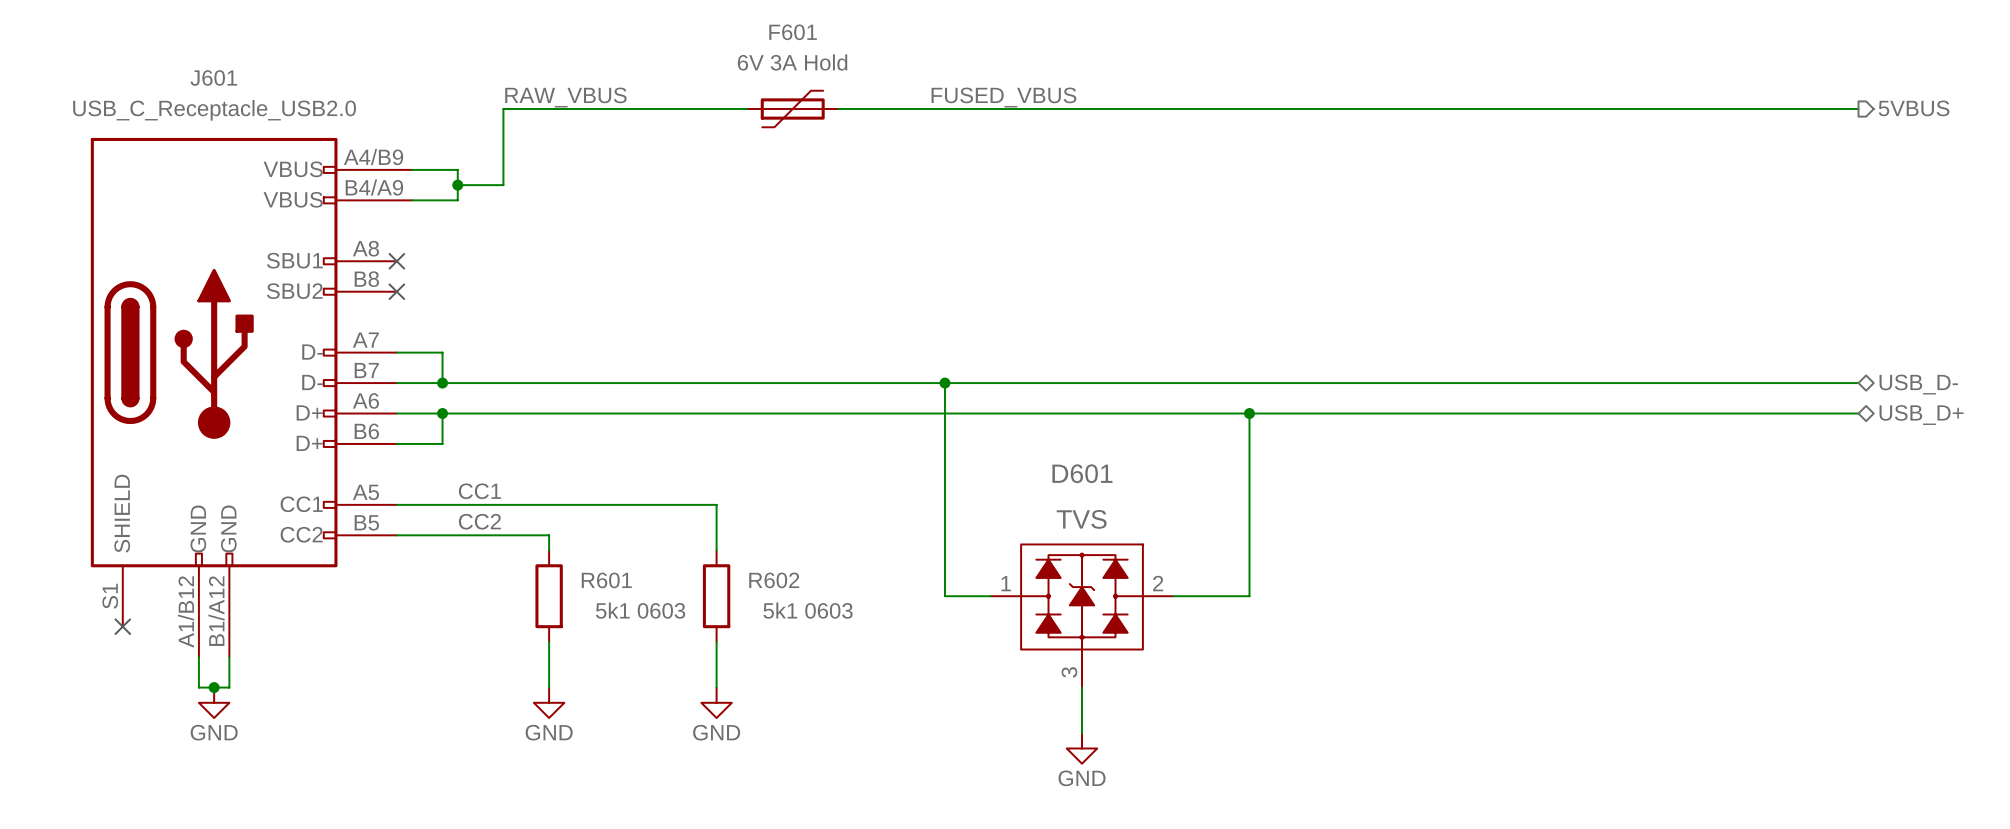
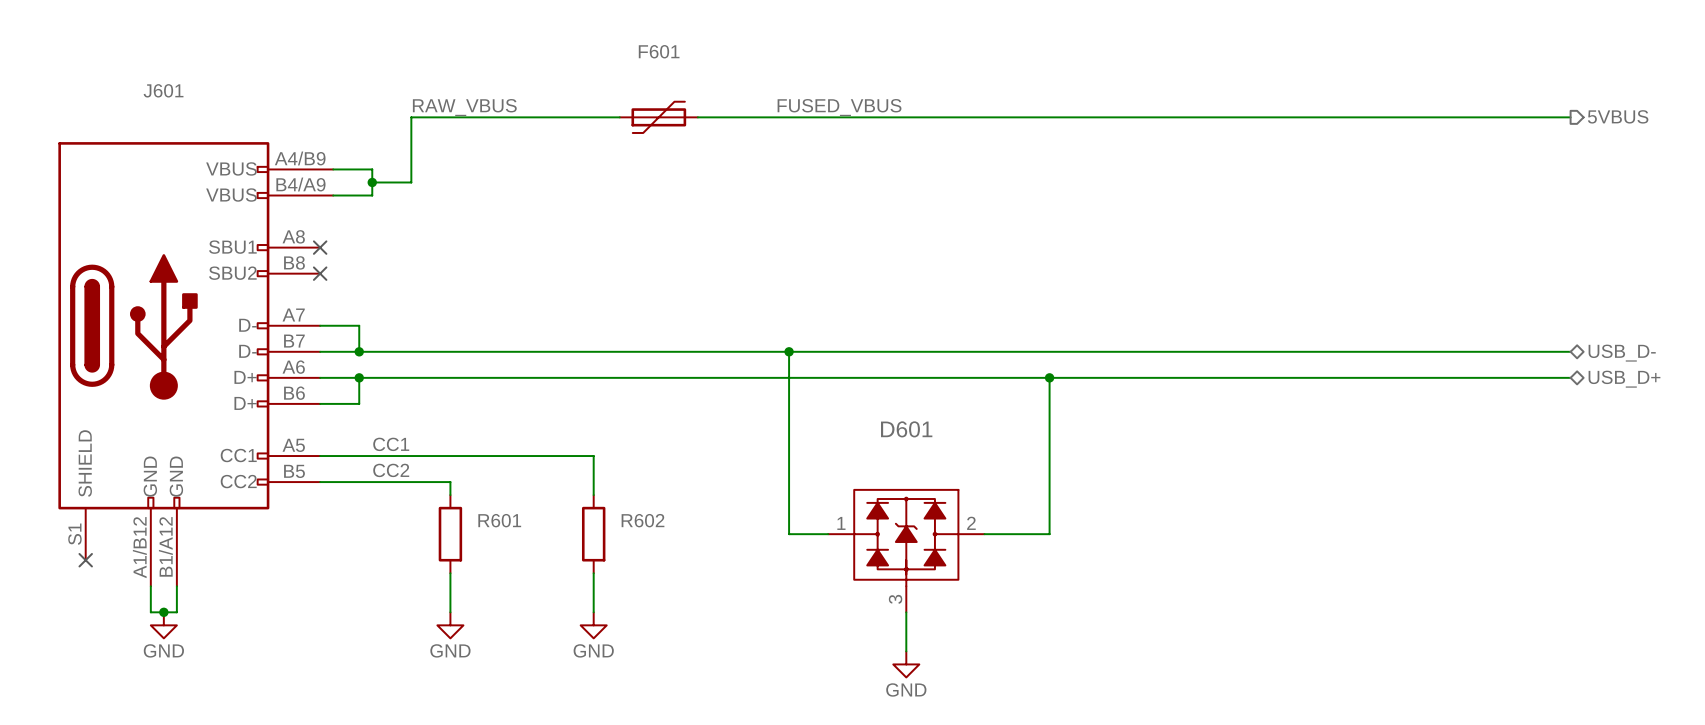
F601 value: 6V 3A Hold (792, 62) -> none
J601 value: USB_C_Receptacle_USB2.0 (214, 110) -> none
D601 value: TVS (1081, 519) -> none
R601 value: 5k1 0603 (640, 610) -> none
R602 value: 5k1 0603 (808, 610) -> none

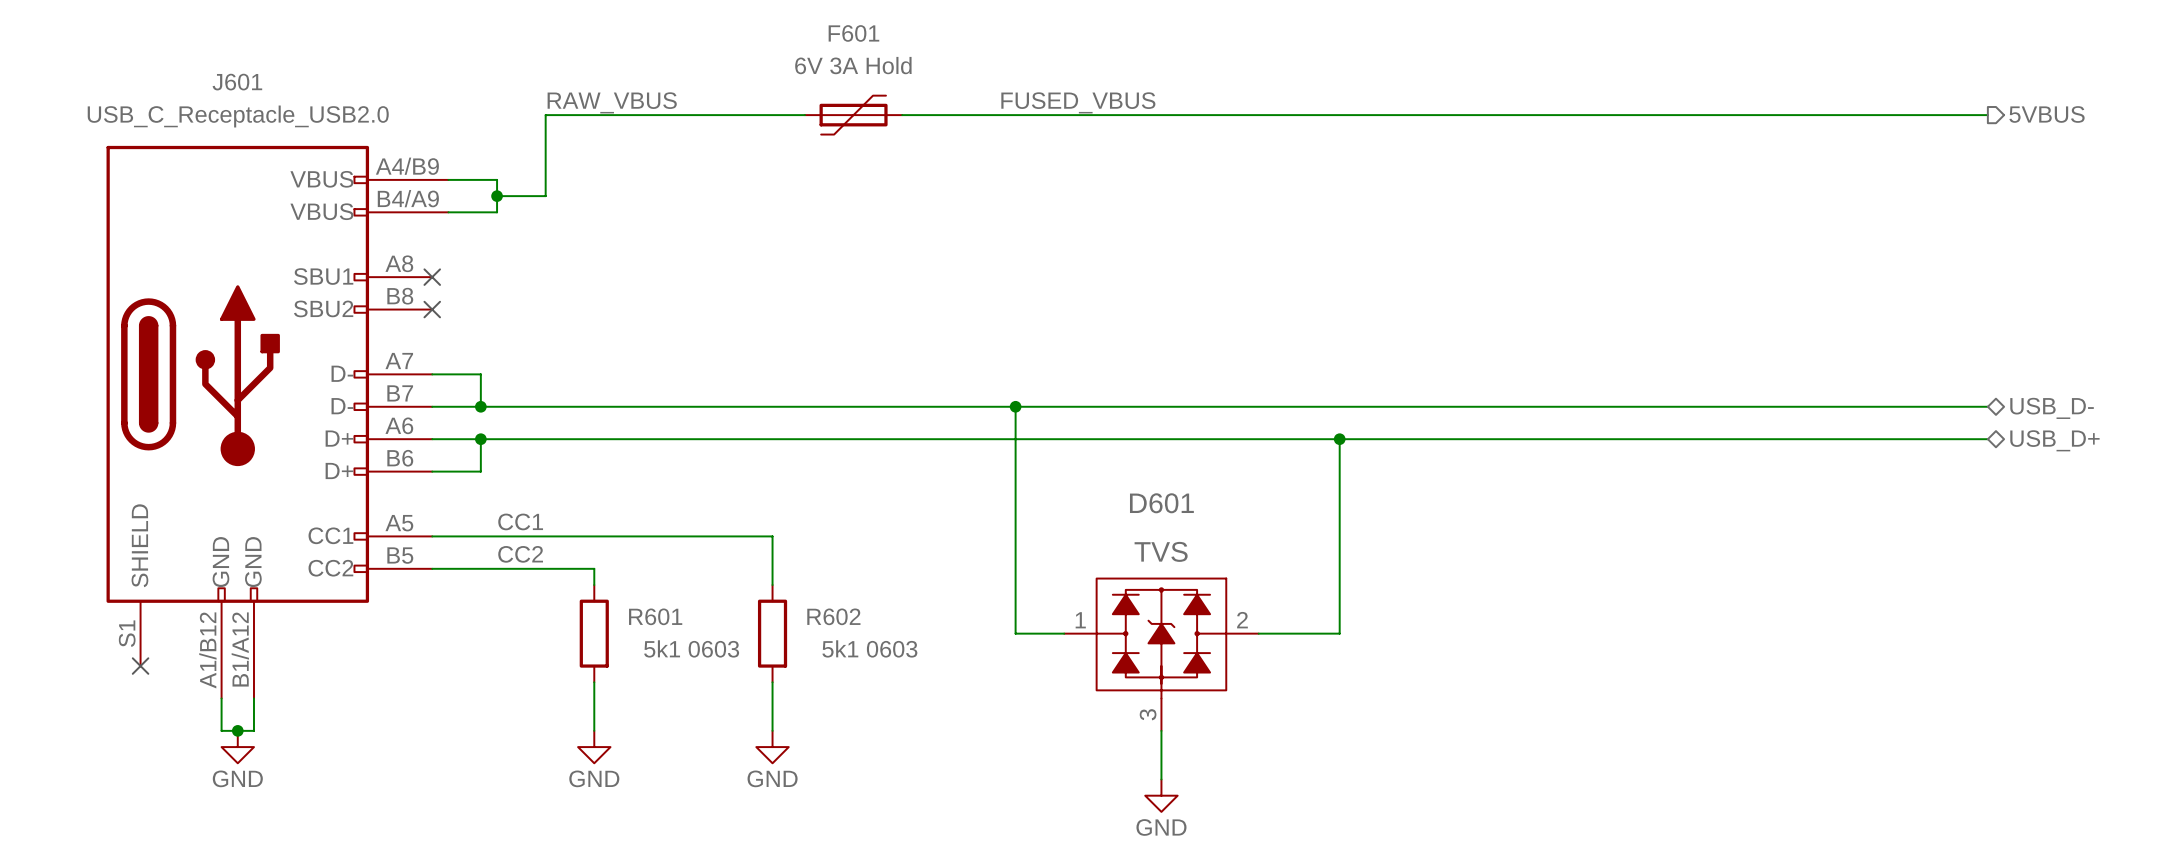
F601 value: none -> 6V 3A Hold (853, 65)
J601 value: none -> USB_C_Receptacle_USB2.0 (238, 116)
D601 value: none -> TVS (1161, 551)
R601 value: none -> 5k1 0603 (691, 648)
R602 value: none -> 5k1 0603 (869, 648)

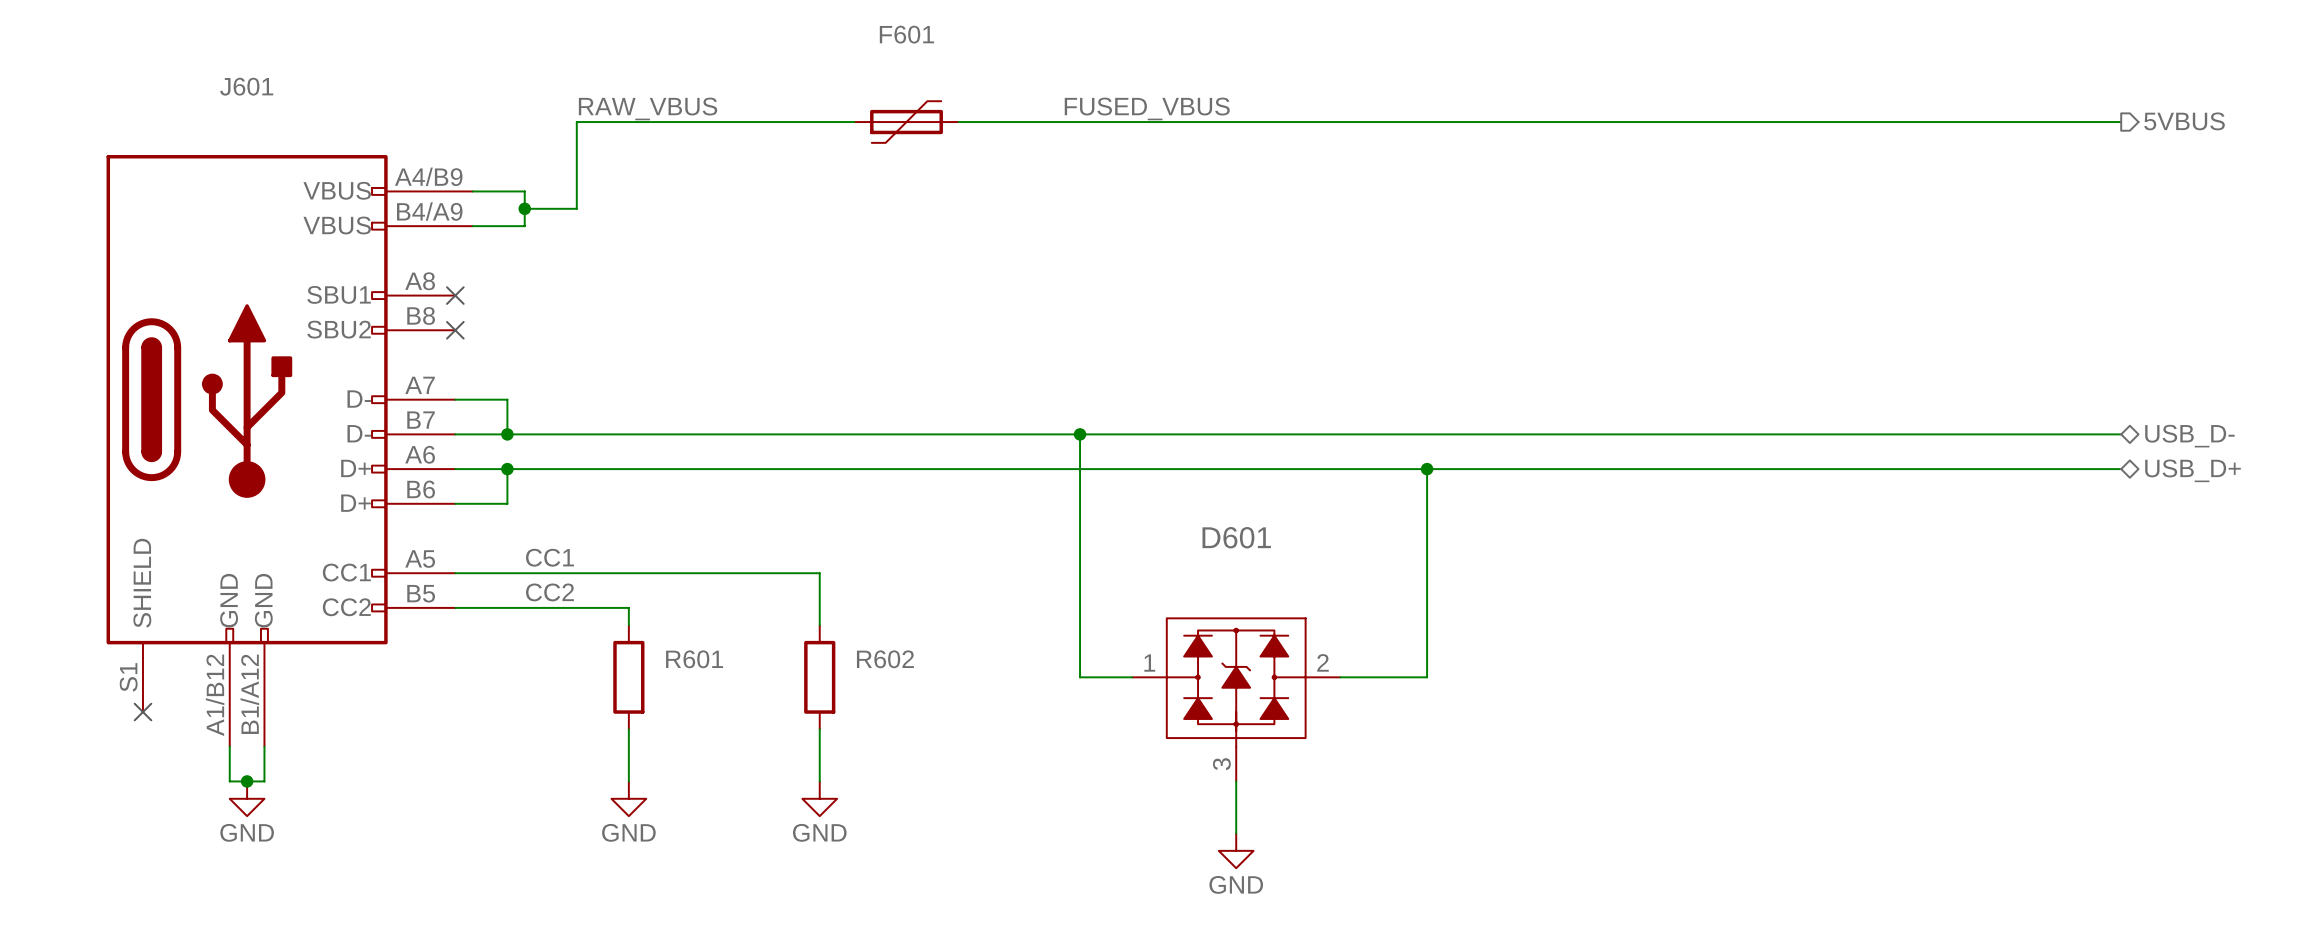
F601 value: 6V 3A Hold (853, 65) -> none
J601 value: USB_C_Receptacle_USB2.0 (238, 116) -> none
D601 value: TVS (1161, 551) -> none
R601 value: 5k1 0603 (691, 648) -> none
R602 value: 5k1 0603 (869, 648) -> none

